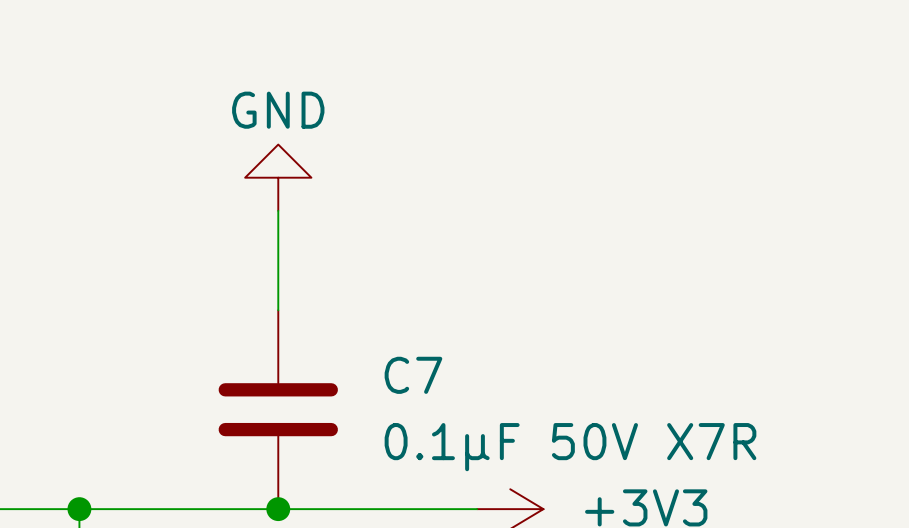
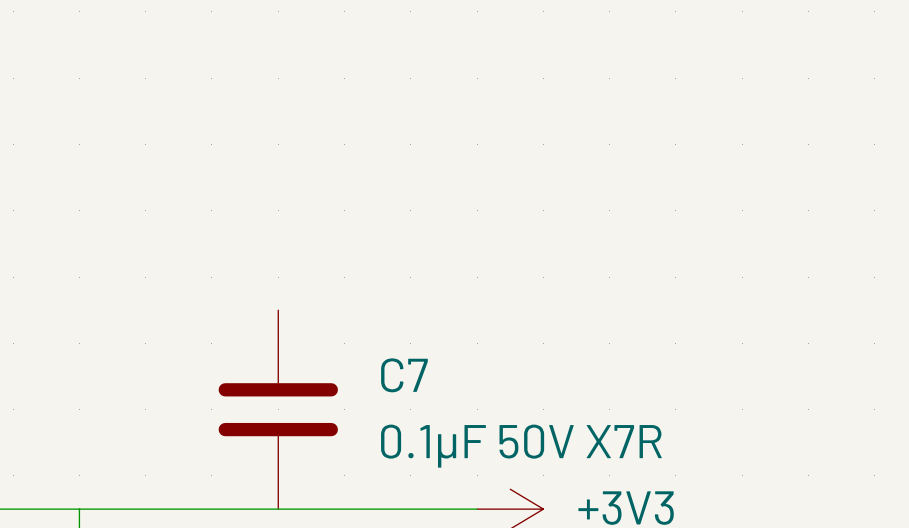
power symbol: GND (278, 177) -> none
wire: (278, 210) (278, 310) -> none
junction: (79, 509) -> none
junction: (278, 509) -> none

